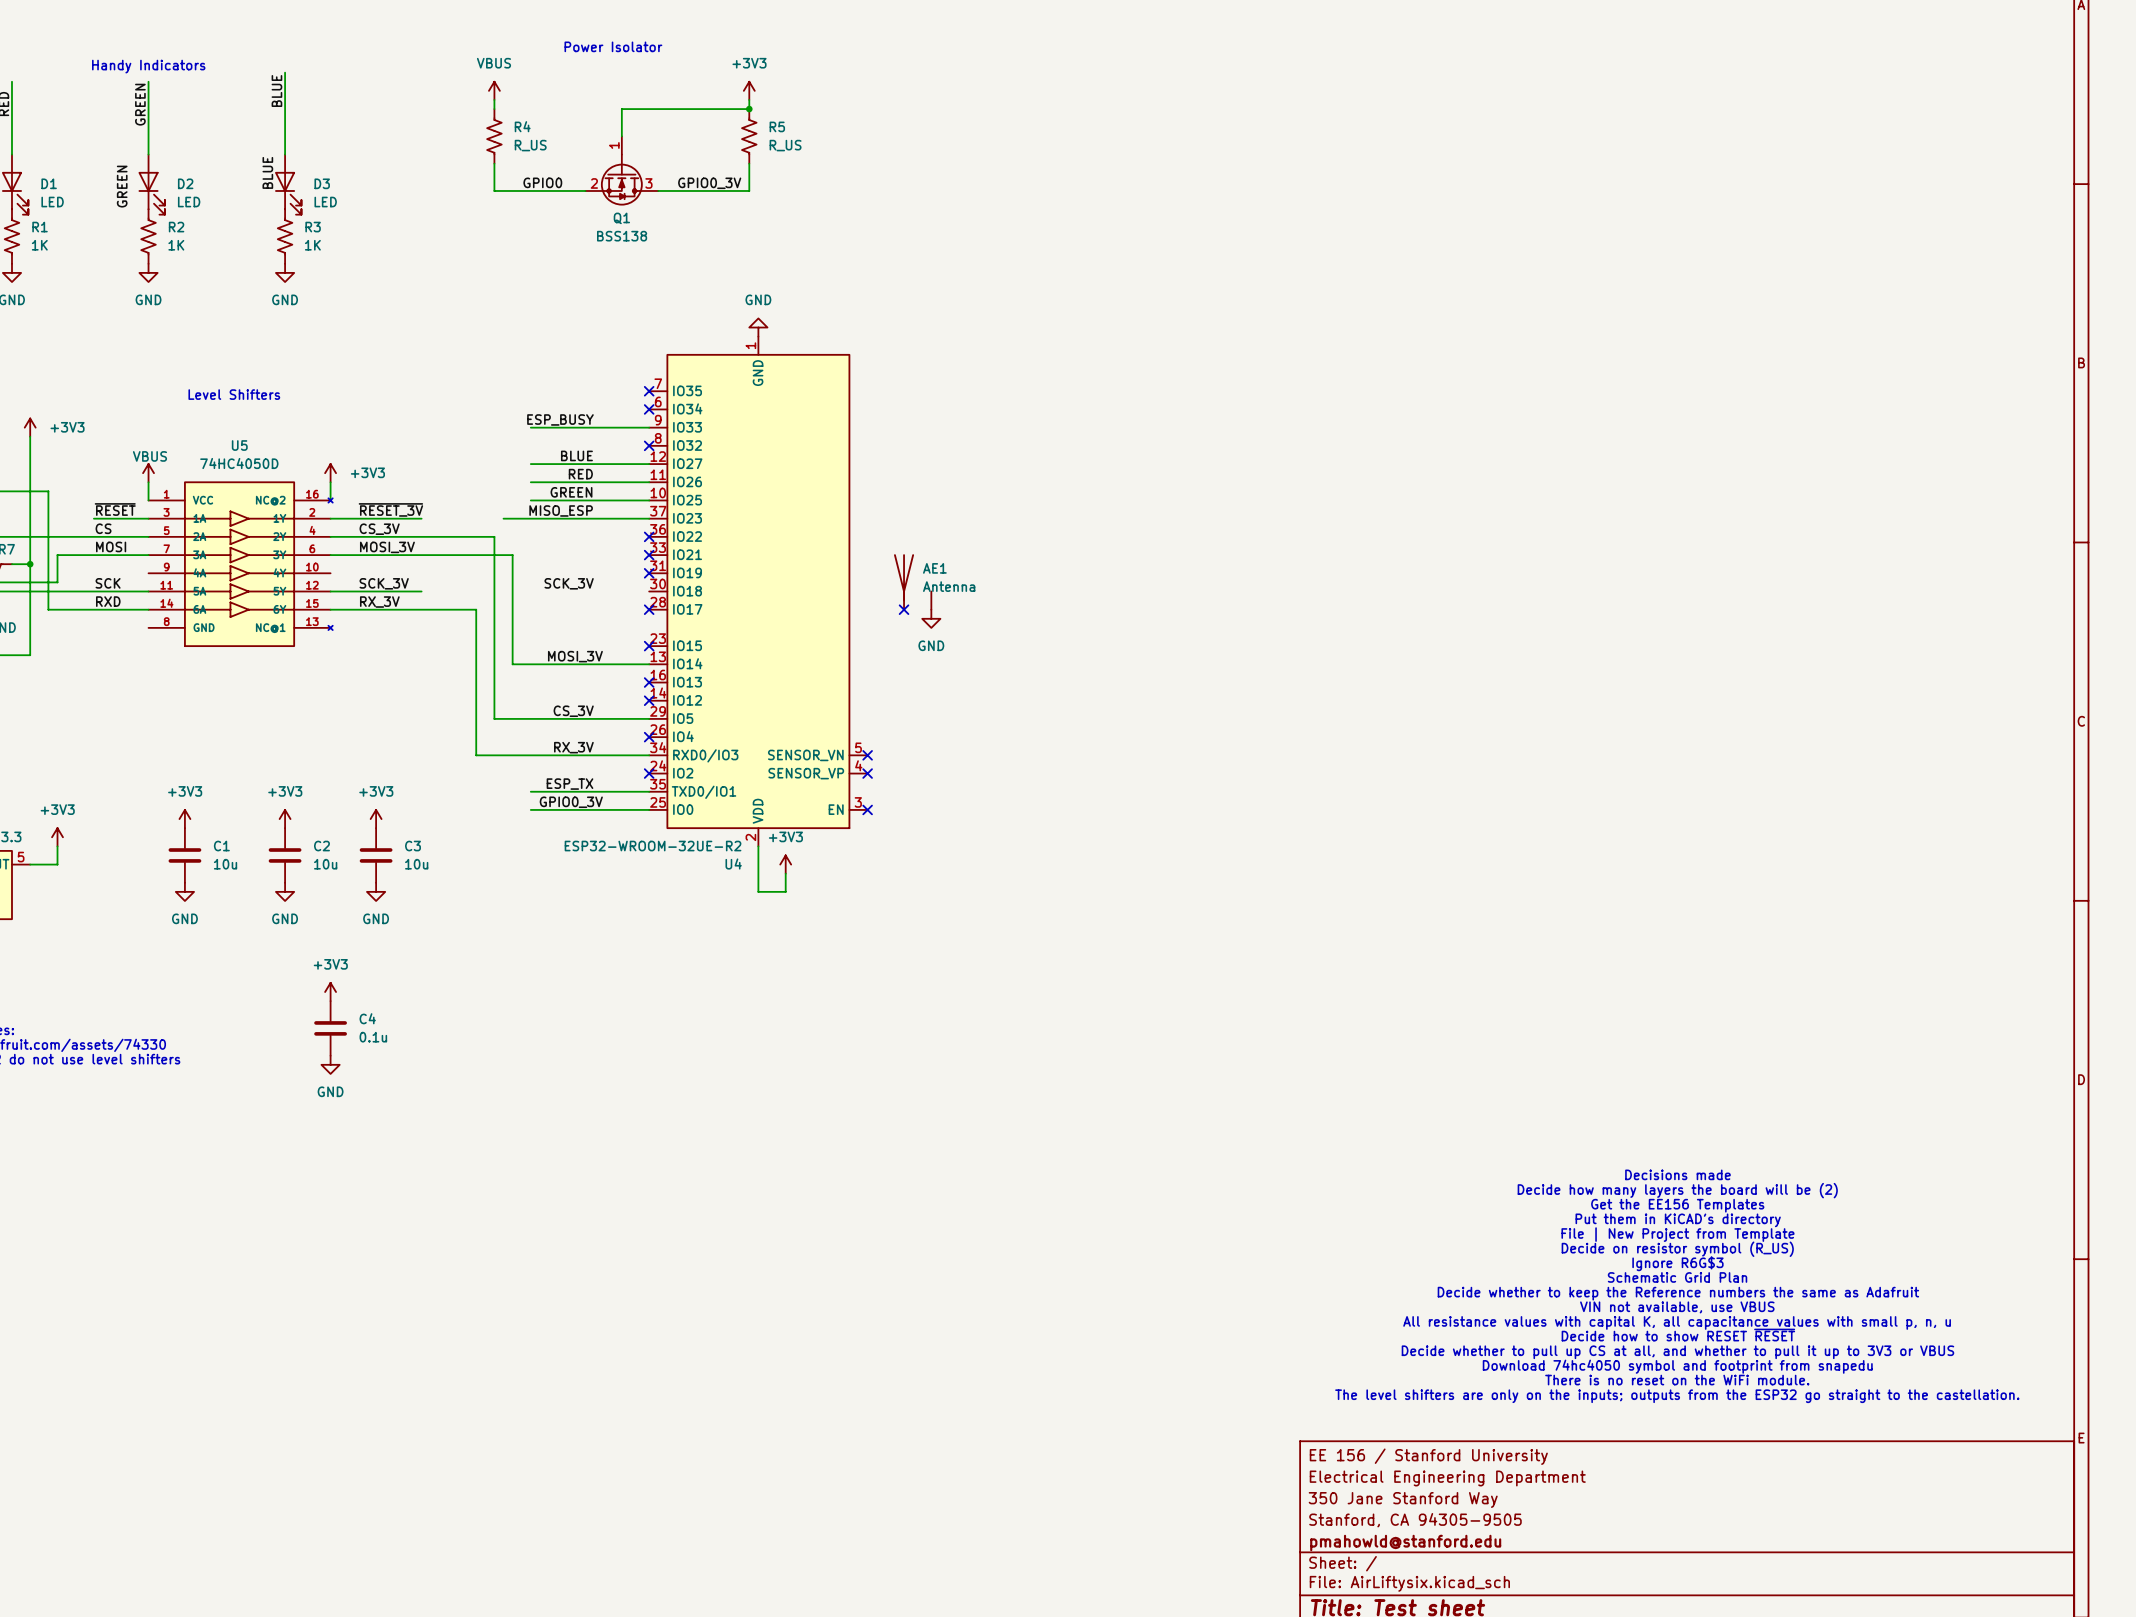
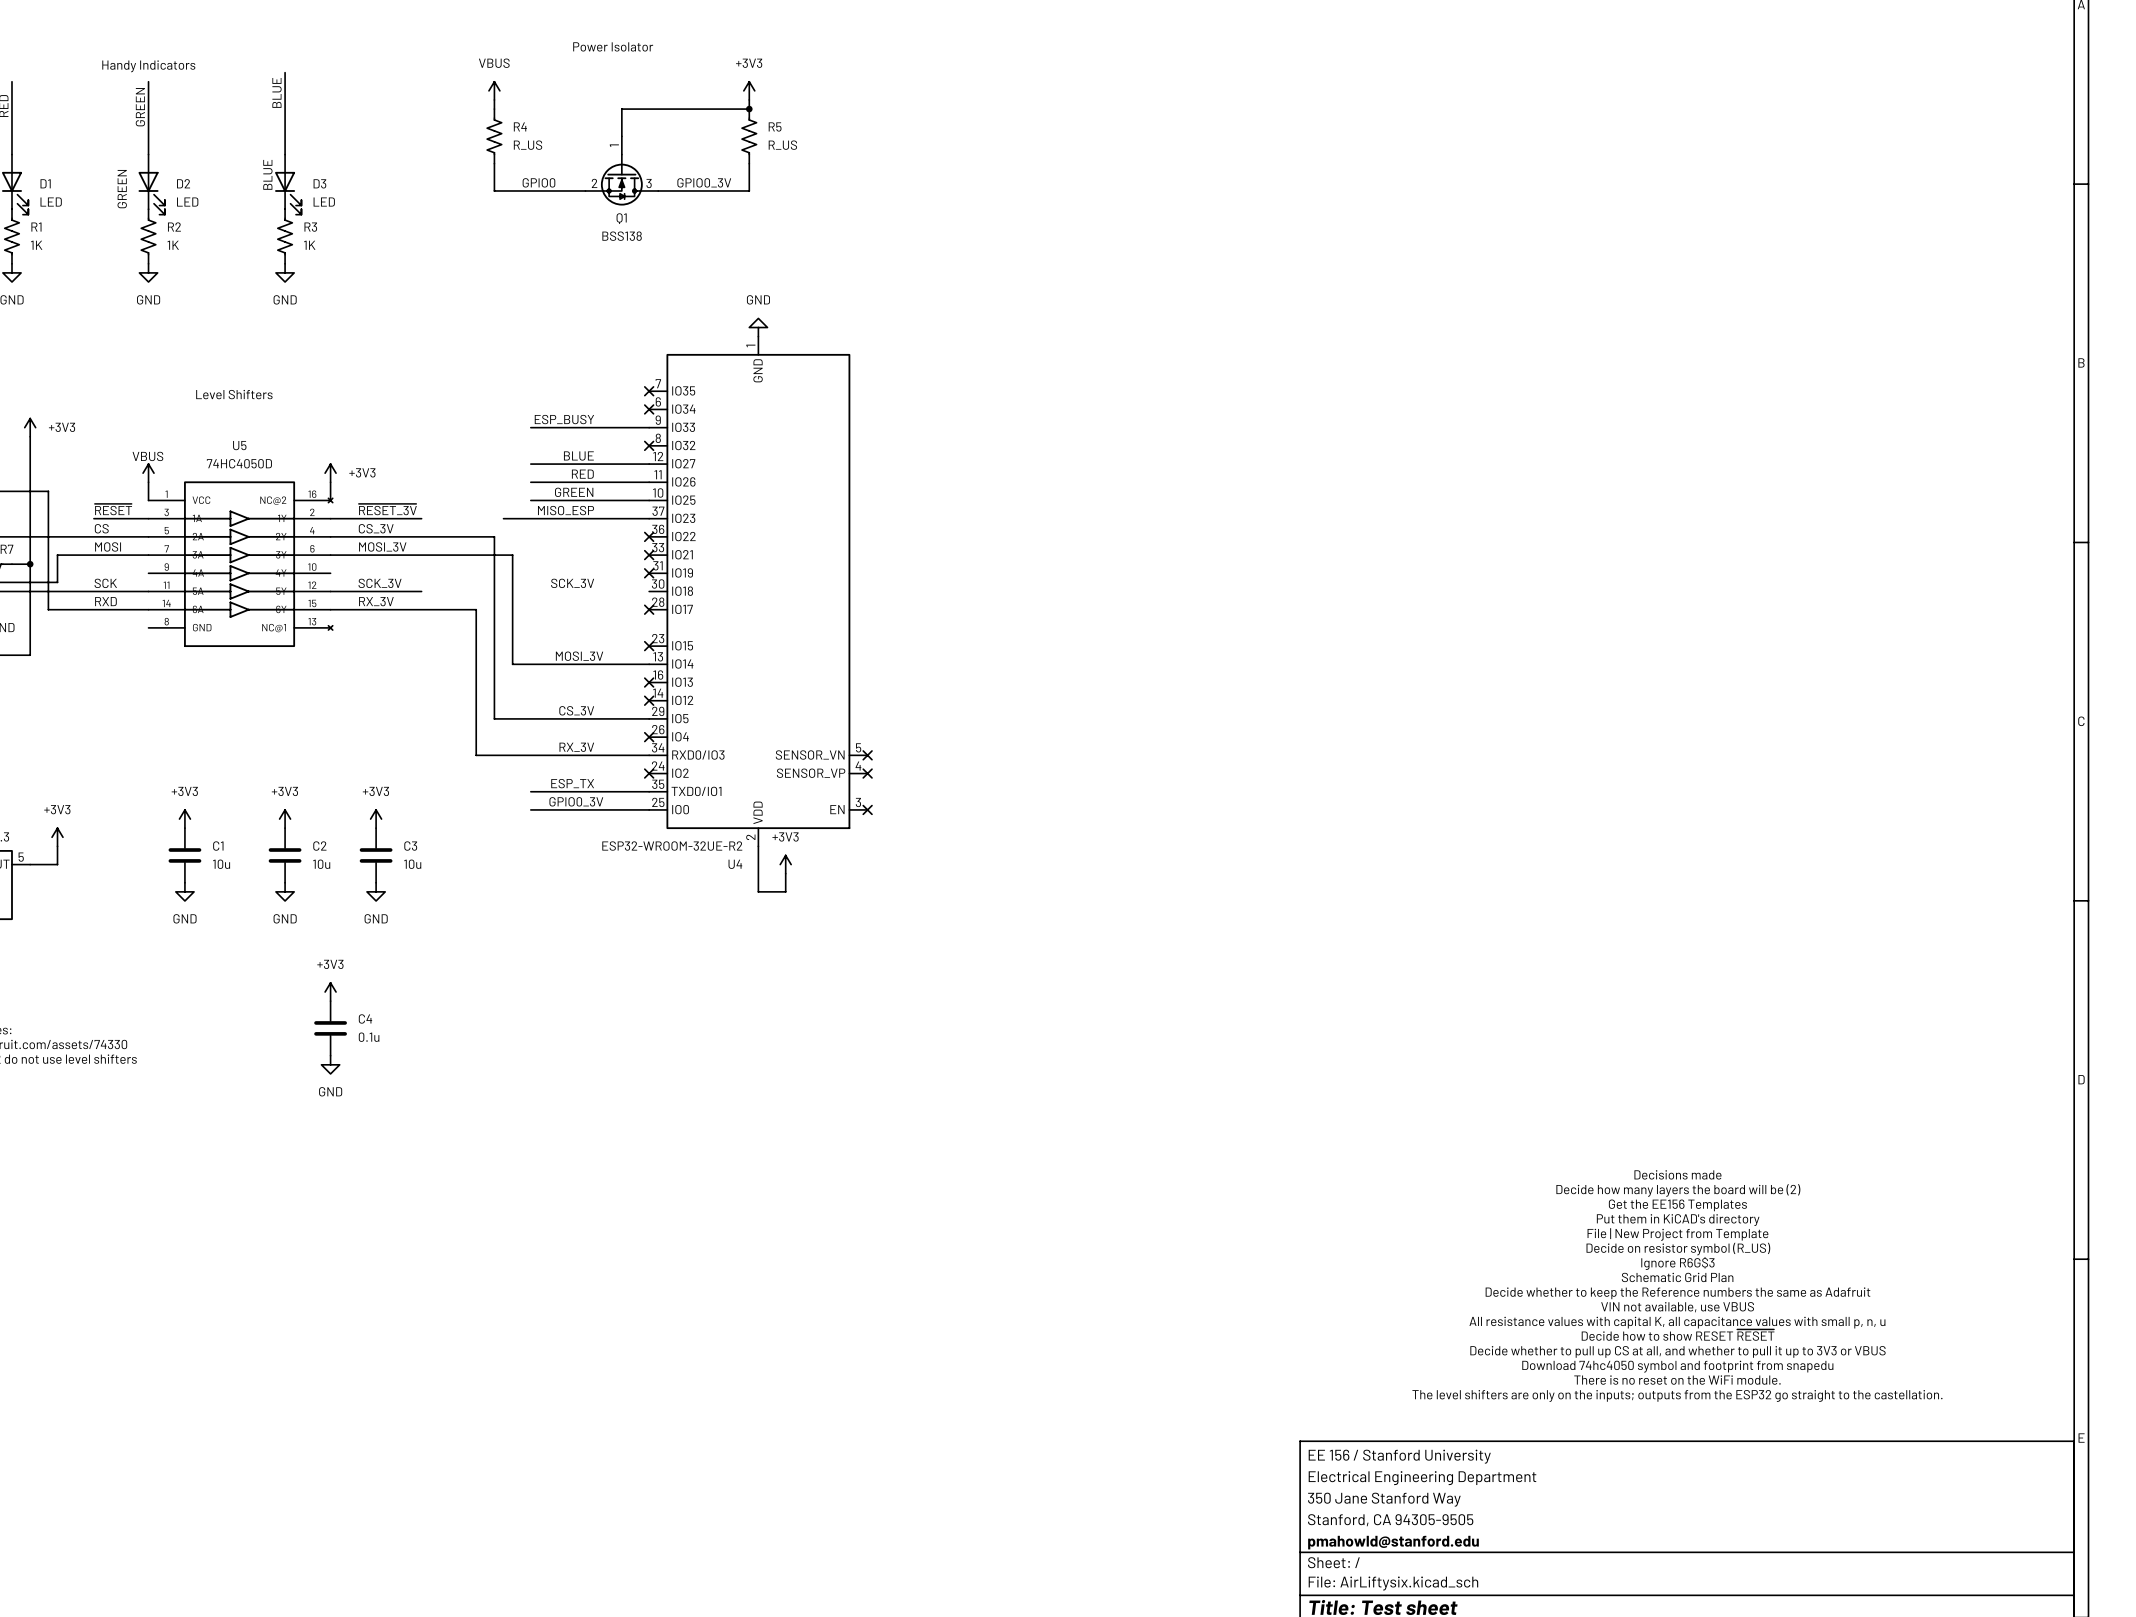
AE1: Antenna (912, 581) -> none
no-connect mark: (904, 609) -> none
power symbol: GND (931, 618) -> none

